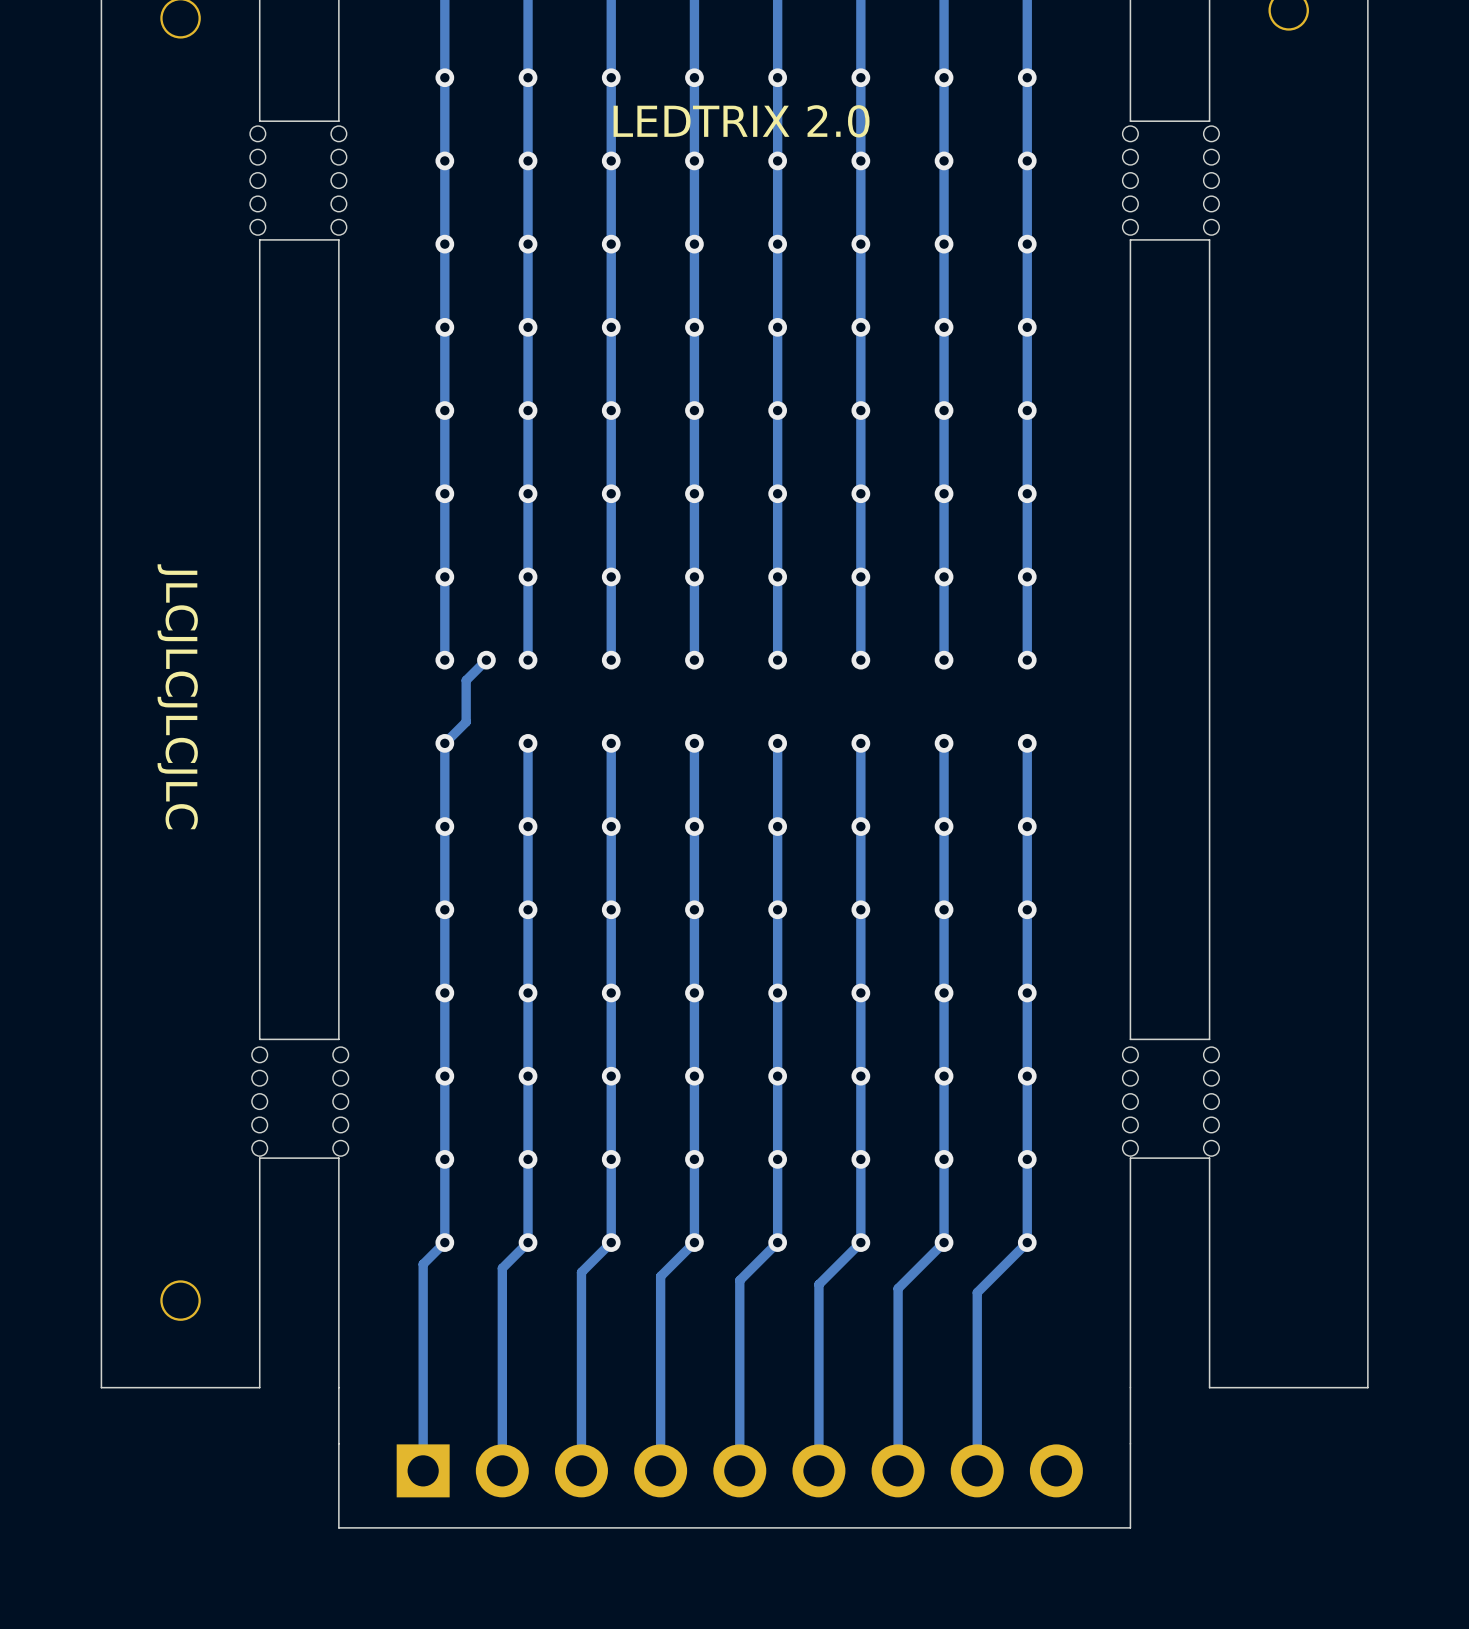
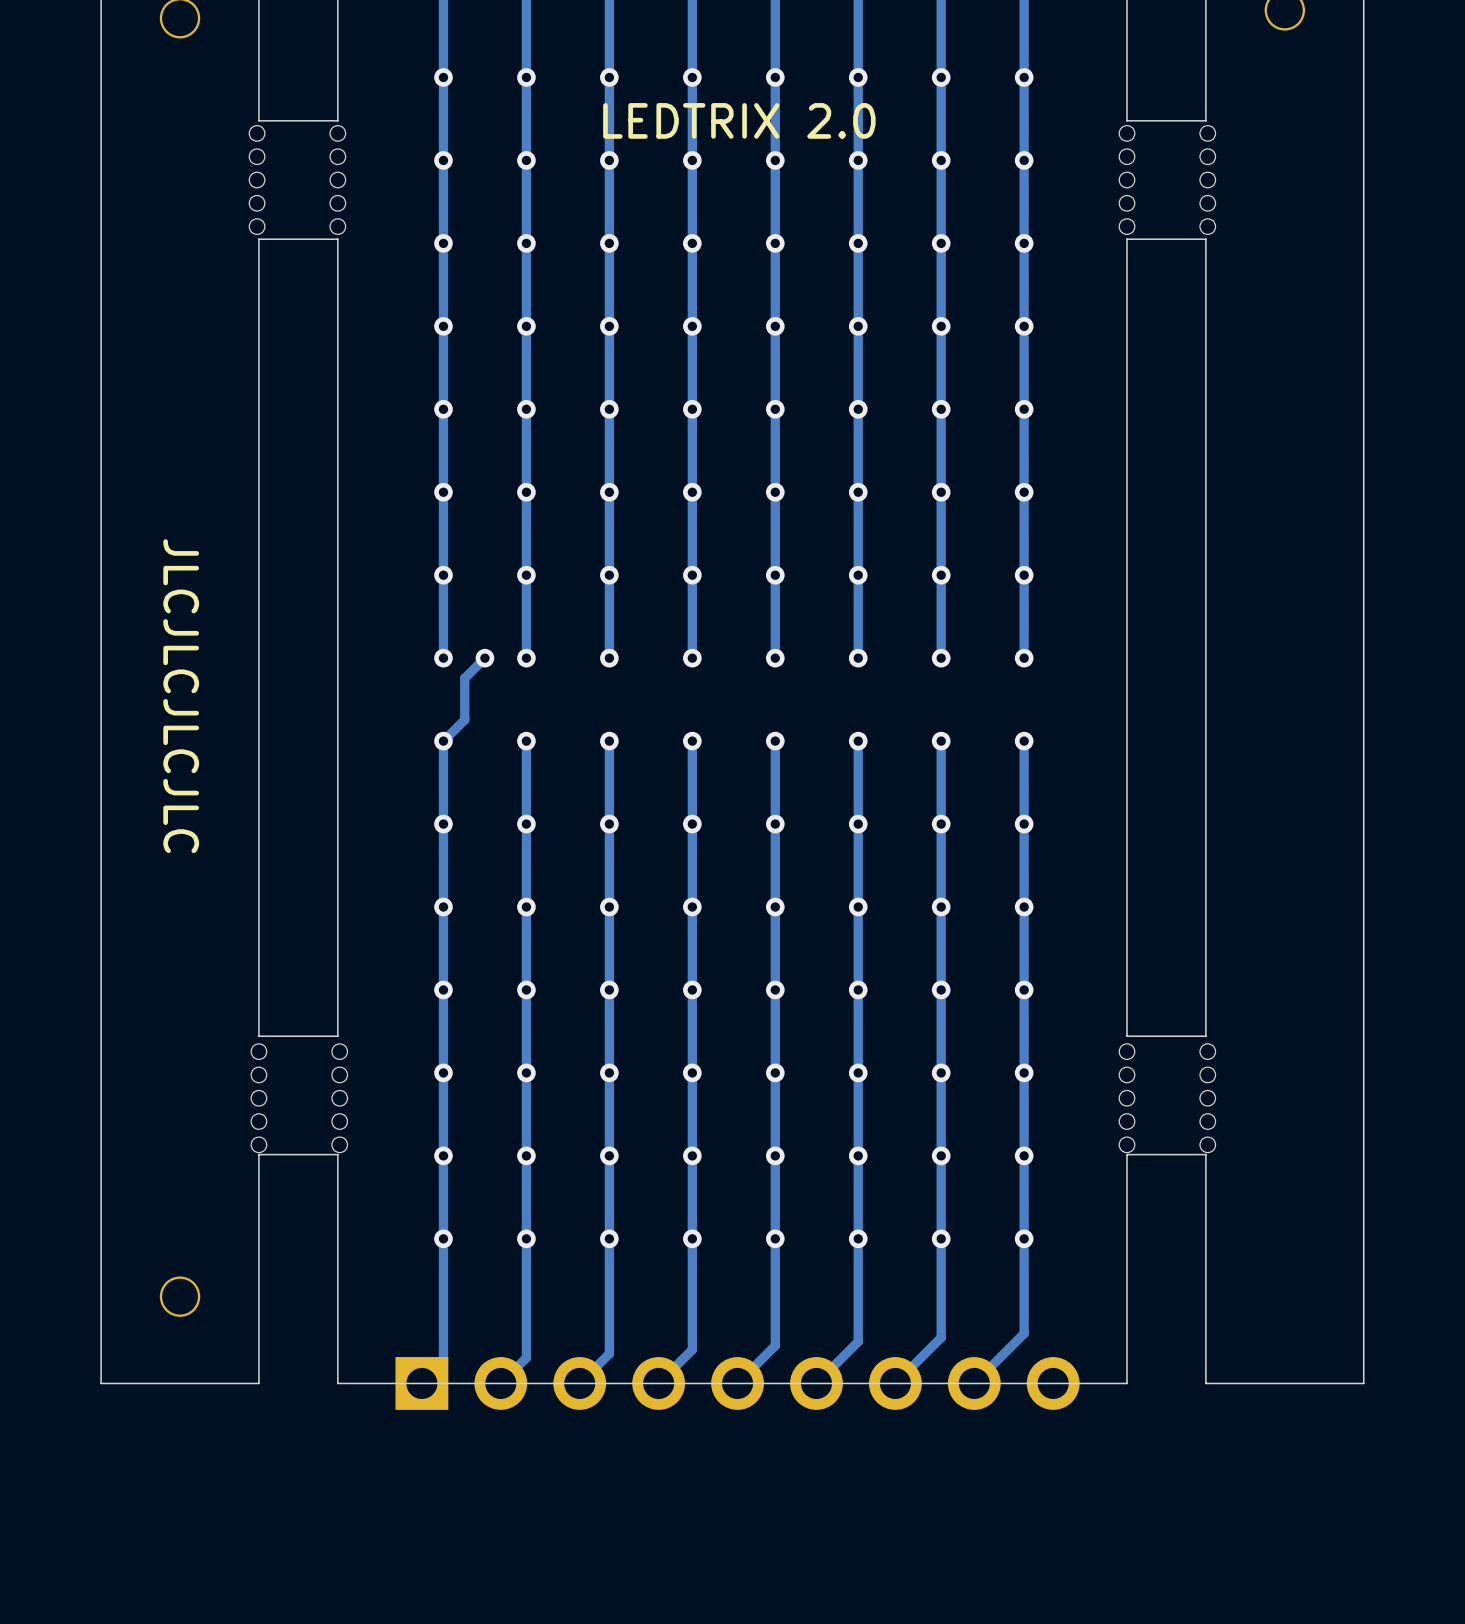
track: (444, 1242) (423, 1264) (423, 1470) -> (443, 1238) (443, 1361) (421, 1383)
track: (528, 1242) (502, 1268) (502, 1470) -> (526, 1238) (526, 1357) (500, 1383)
track: (611, 1242) (581, 1272) (581, 1470) -> (609, 1238) (609, 1353) (579, 1383)
track: (694, 1242) (660, 1276) (660, 1470) -> (692, 1238) (692, 1349) (658, 1383)
track: (777, 1242) (739, 1280) (739, 1470) -> (775, 1238) (775, 1345) (737, 1383)
track: (860, 1242) (818, 1284) (818, 1470) -> (858, 1238) (858, 1341) (816, 1383)
track: (944, 1242) (898, 1288) (898, 1470) -> (941, 1238) (941, 1337) (895, 1383)
track: (1027, 1242) (977, 1292) (977, 1470) -> (1024, 1238) (1024, 1333) (974, 1383)
board edge: (1130, 1387) (1130, 1527) (338, 1527) (338, 1387) -> (1126, 1383) (337, 1383)
part position: (739, 1470) -> (737, 1383)

